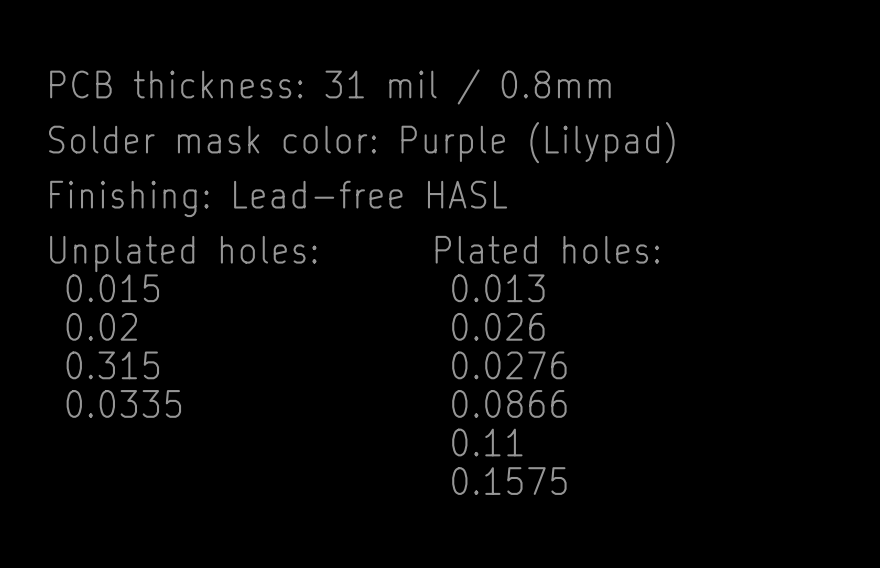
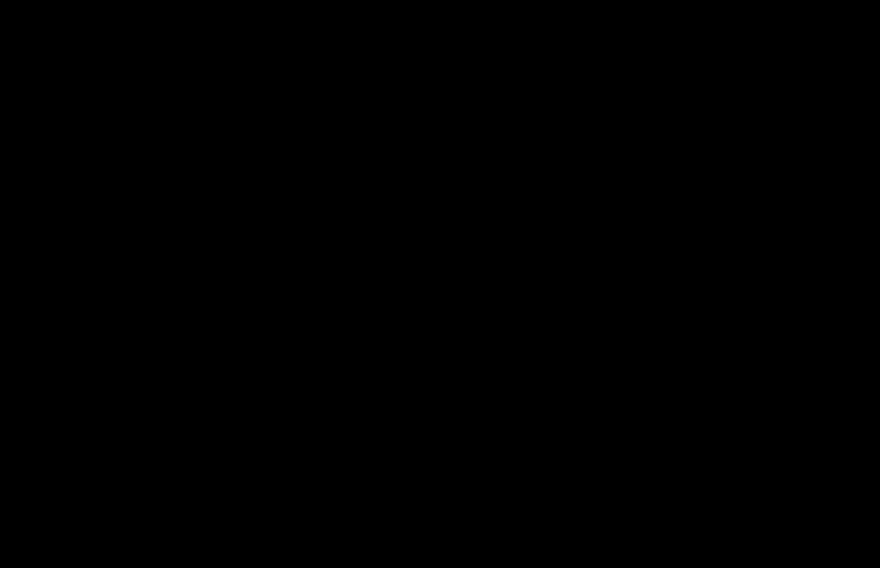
text: PCB thickness: 31 mil / 0.8mm (330, 86) -> none
text: Solder mask color: Purple (Lilypad) (361, 142) -> none
text: Finishing: Lead-free HASL (278, 198) -> none
text: Plated holes: (547, 249) -> none
text: Unplated holes: (183, 254) -> none
text: 0.015 (112, 288) -> none
text: 0.013 (498, 288) -> none
text: 0.02 (101, 326) -> none
text: 0.026 (498, 326) -> none
text: 0.315 (112, 365) -> none
text: 0.0276 (509, 365) -> none
text: 0.0335 (123, 403) -> none
text: 0.0866 (509, 403) -> none
text: 0.11 (487, 442) -> none
text: 0.1575 (509, 481) -> none

